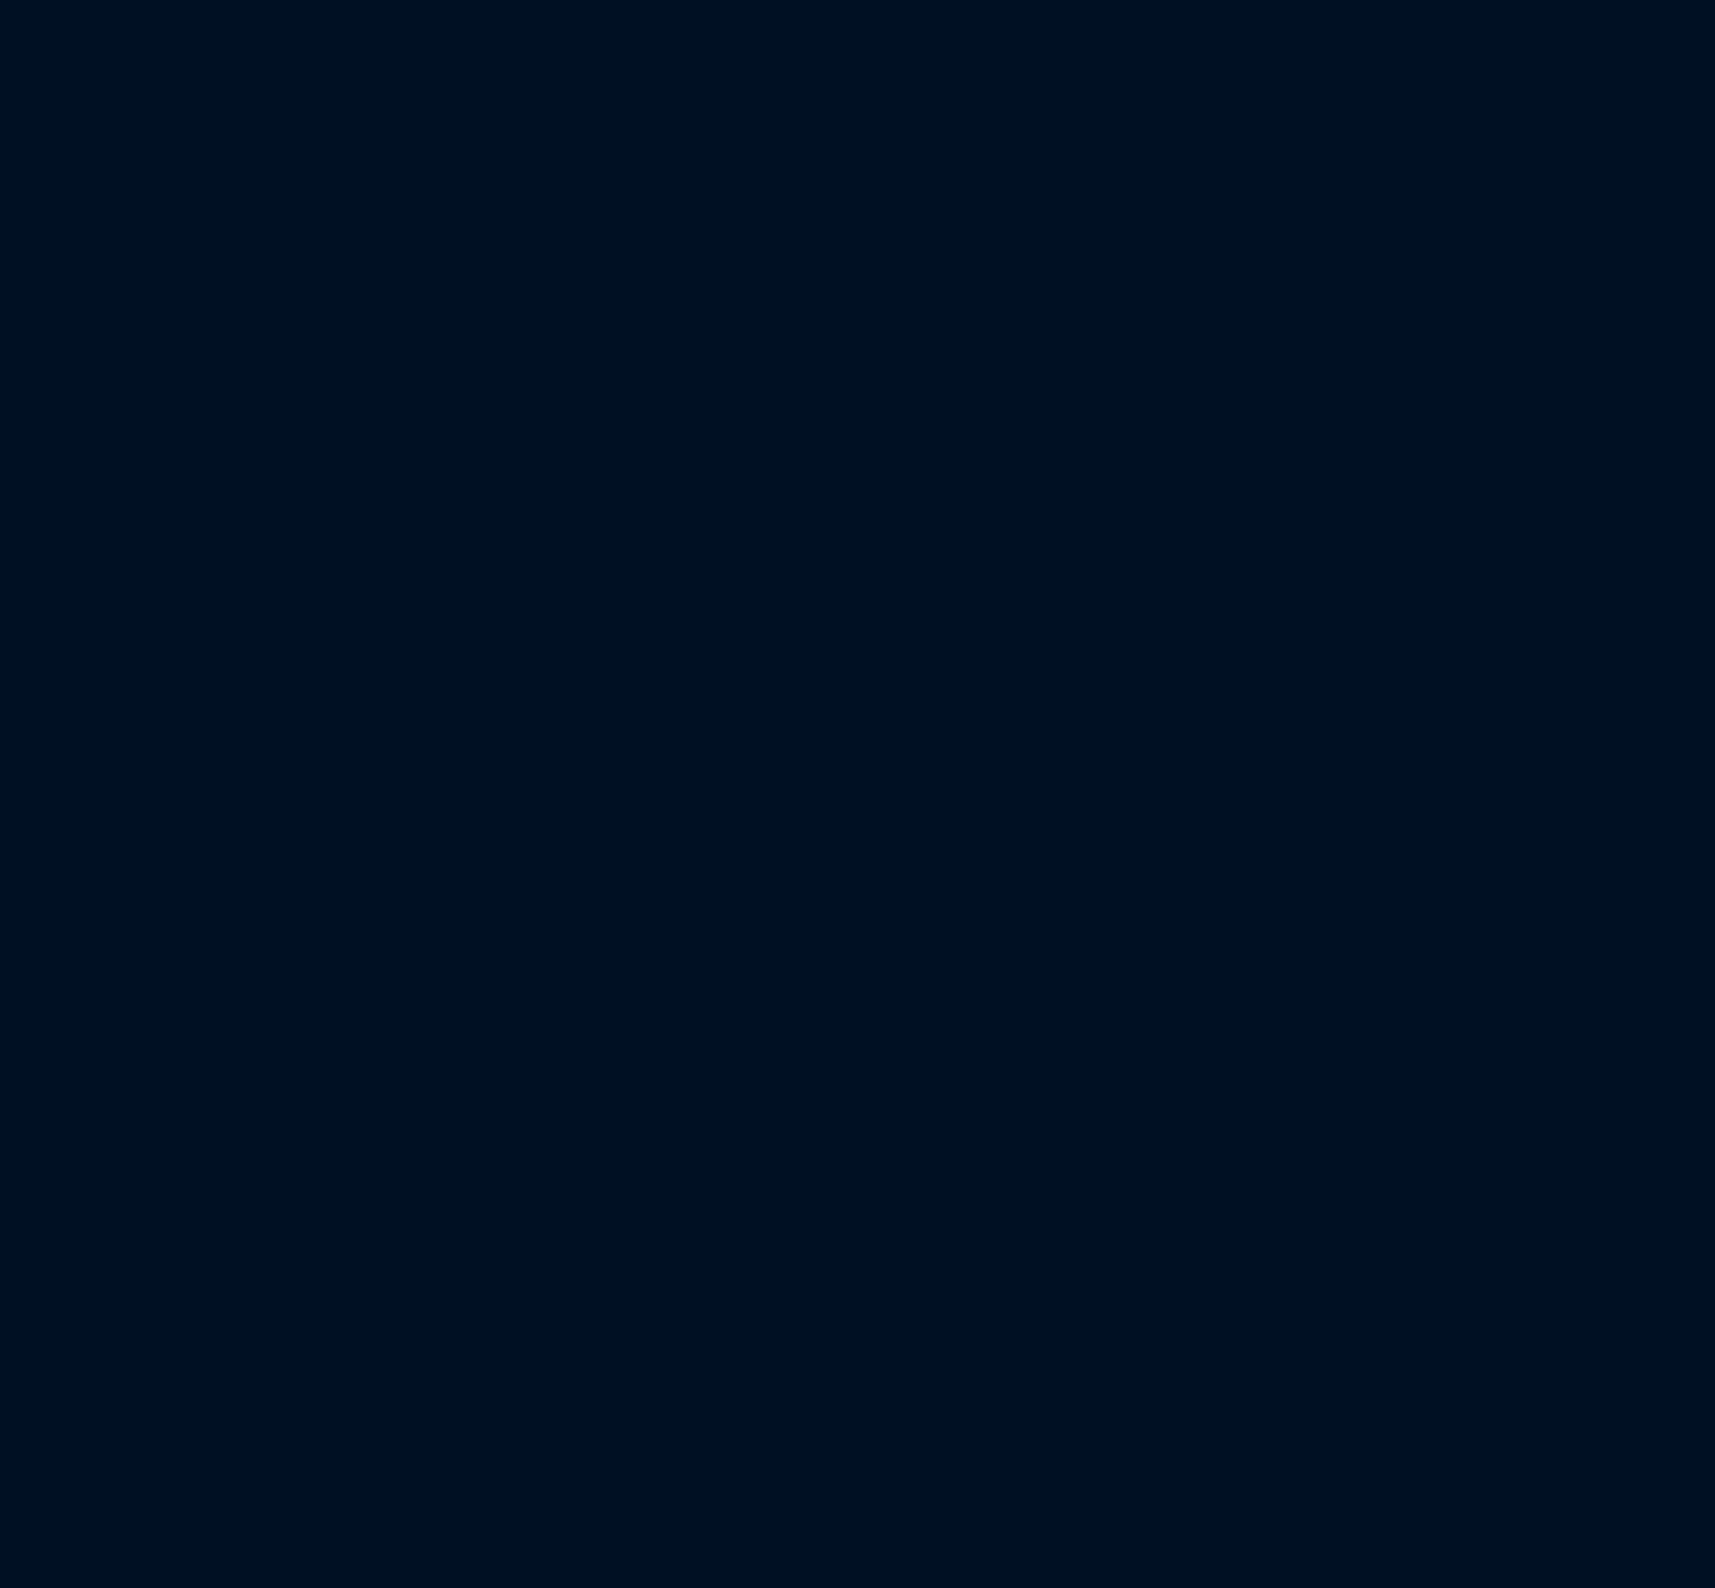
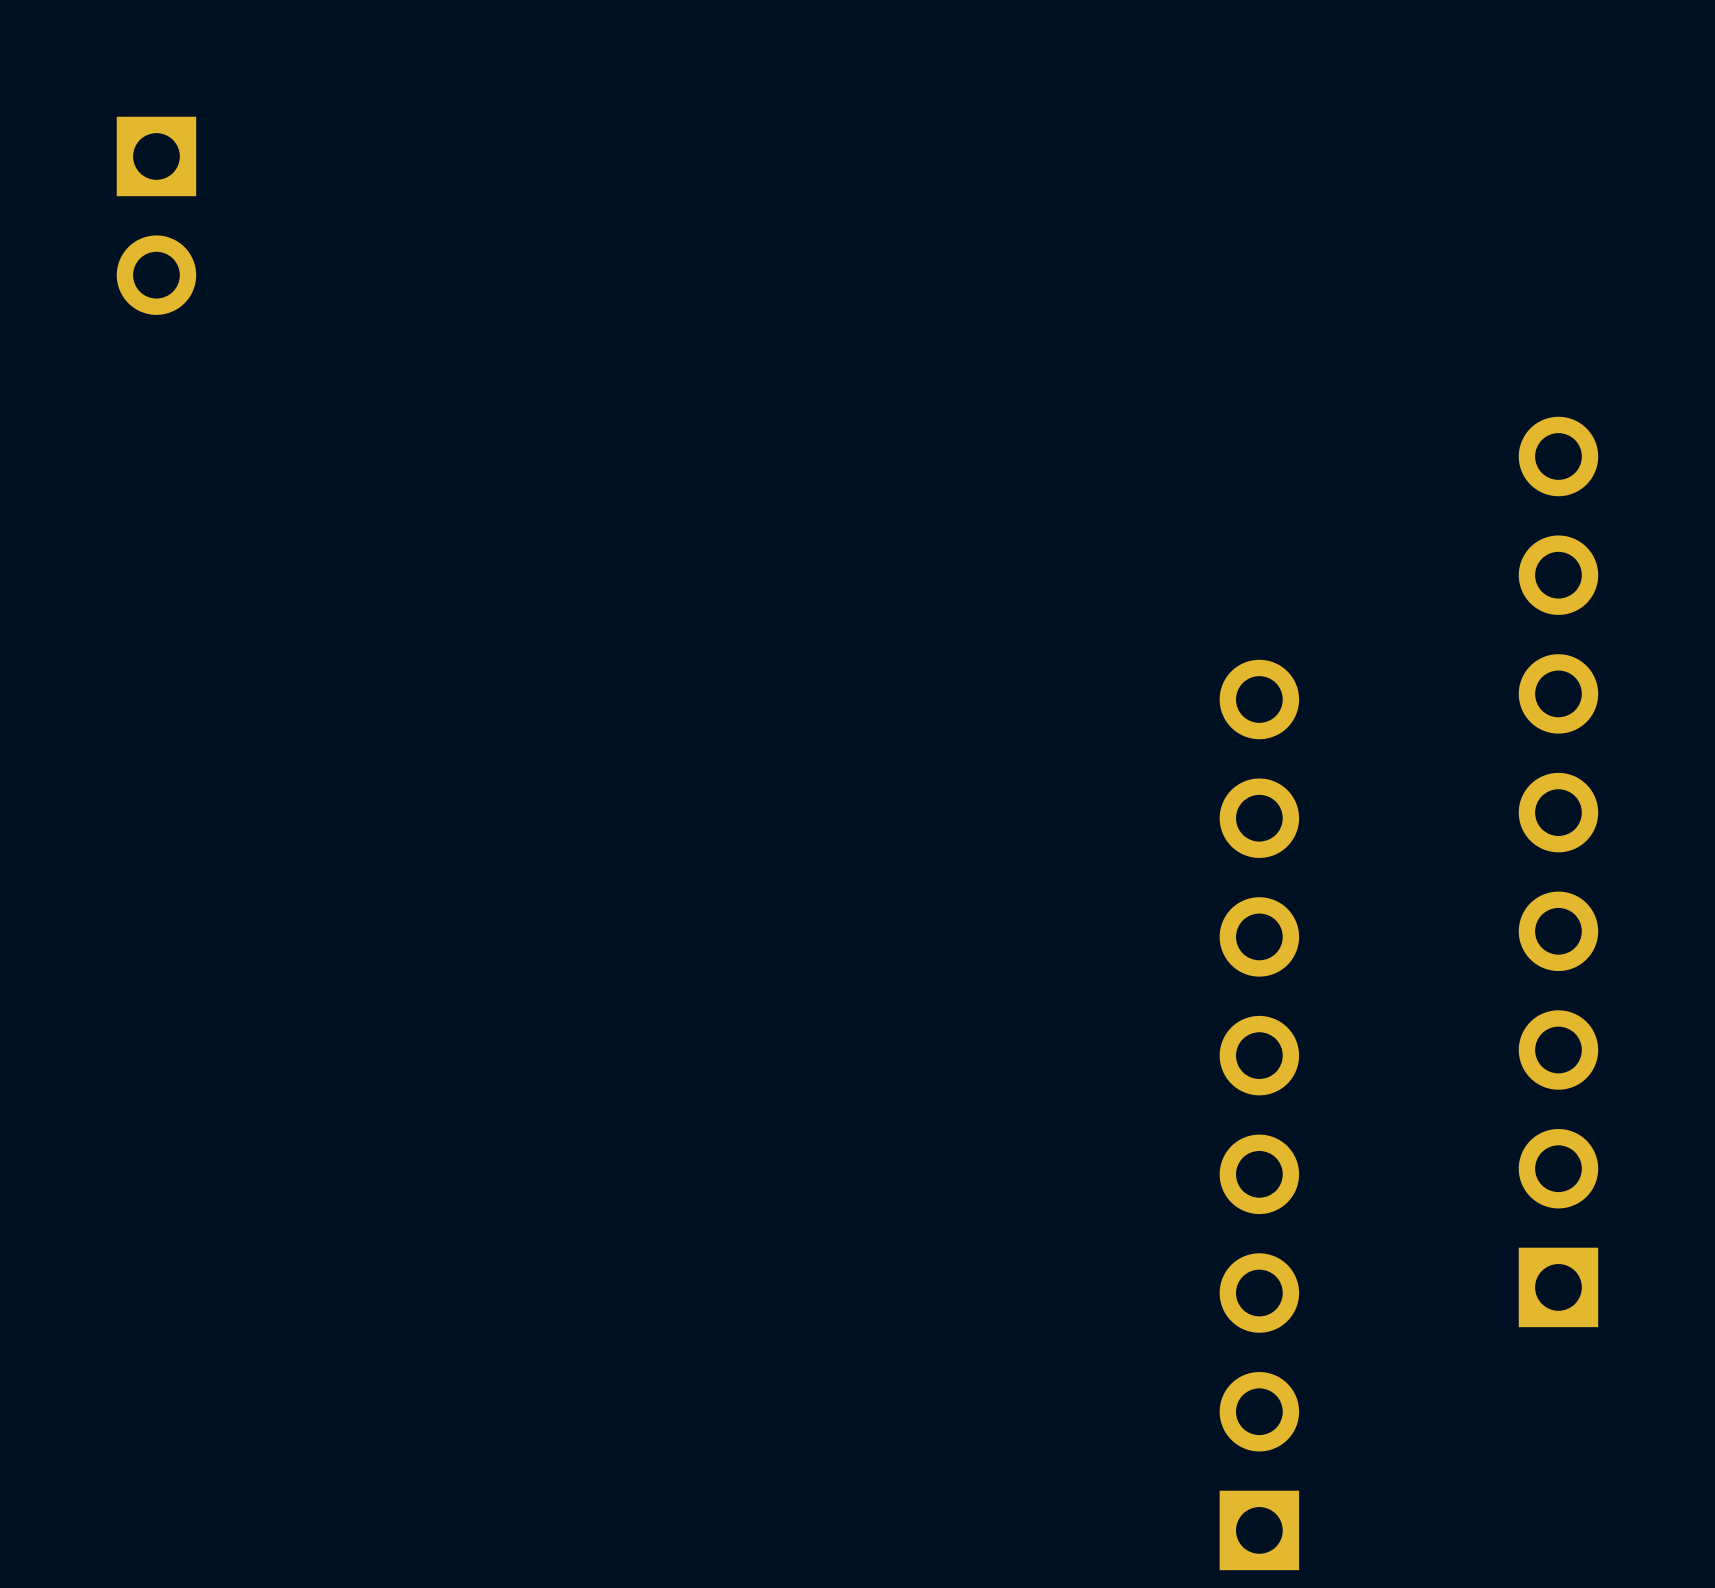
part: none -> (156, 215)
part: none -> (1558, 871)
part: none -> (1259, 1114)

